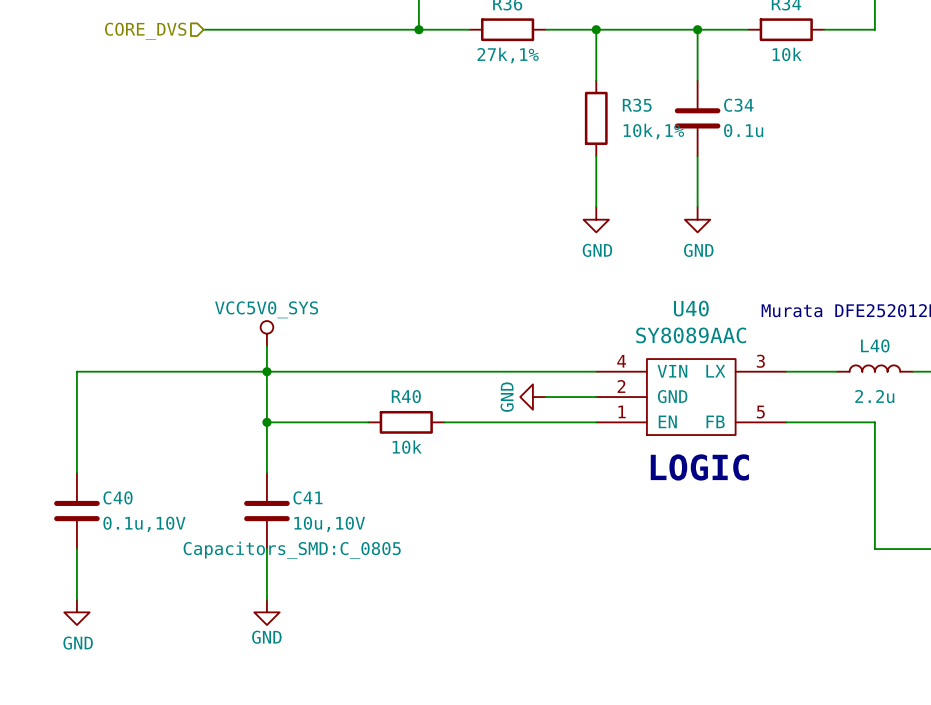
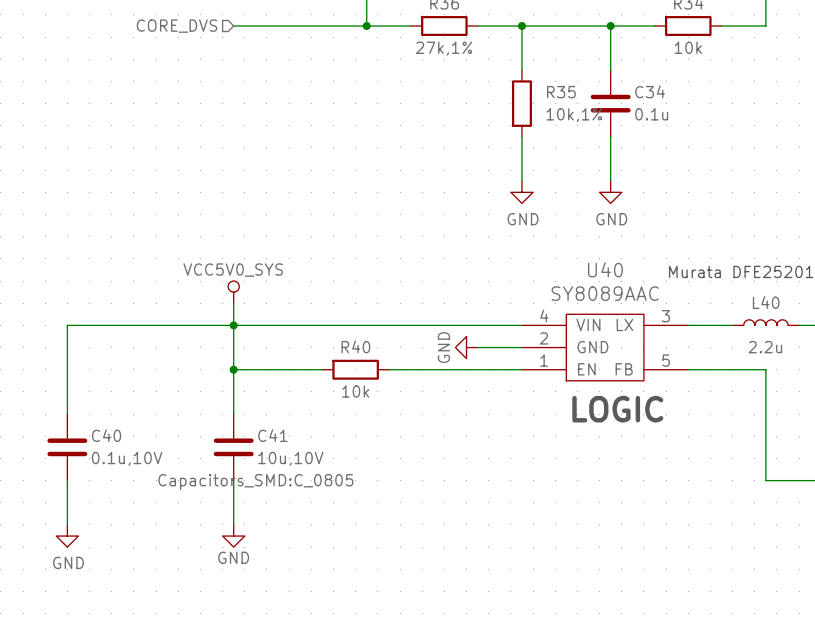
wire: (203, 29) (266, 29) -> none
hierarchical label position: CORE_DVS (145, 31) -> CORE_DVS (177, 26)

